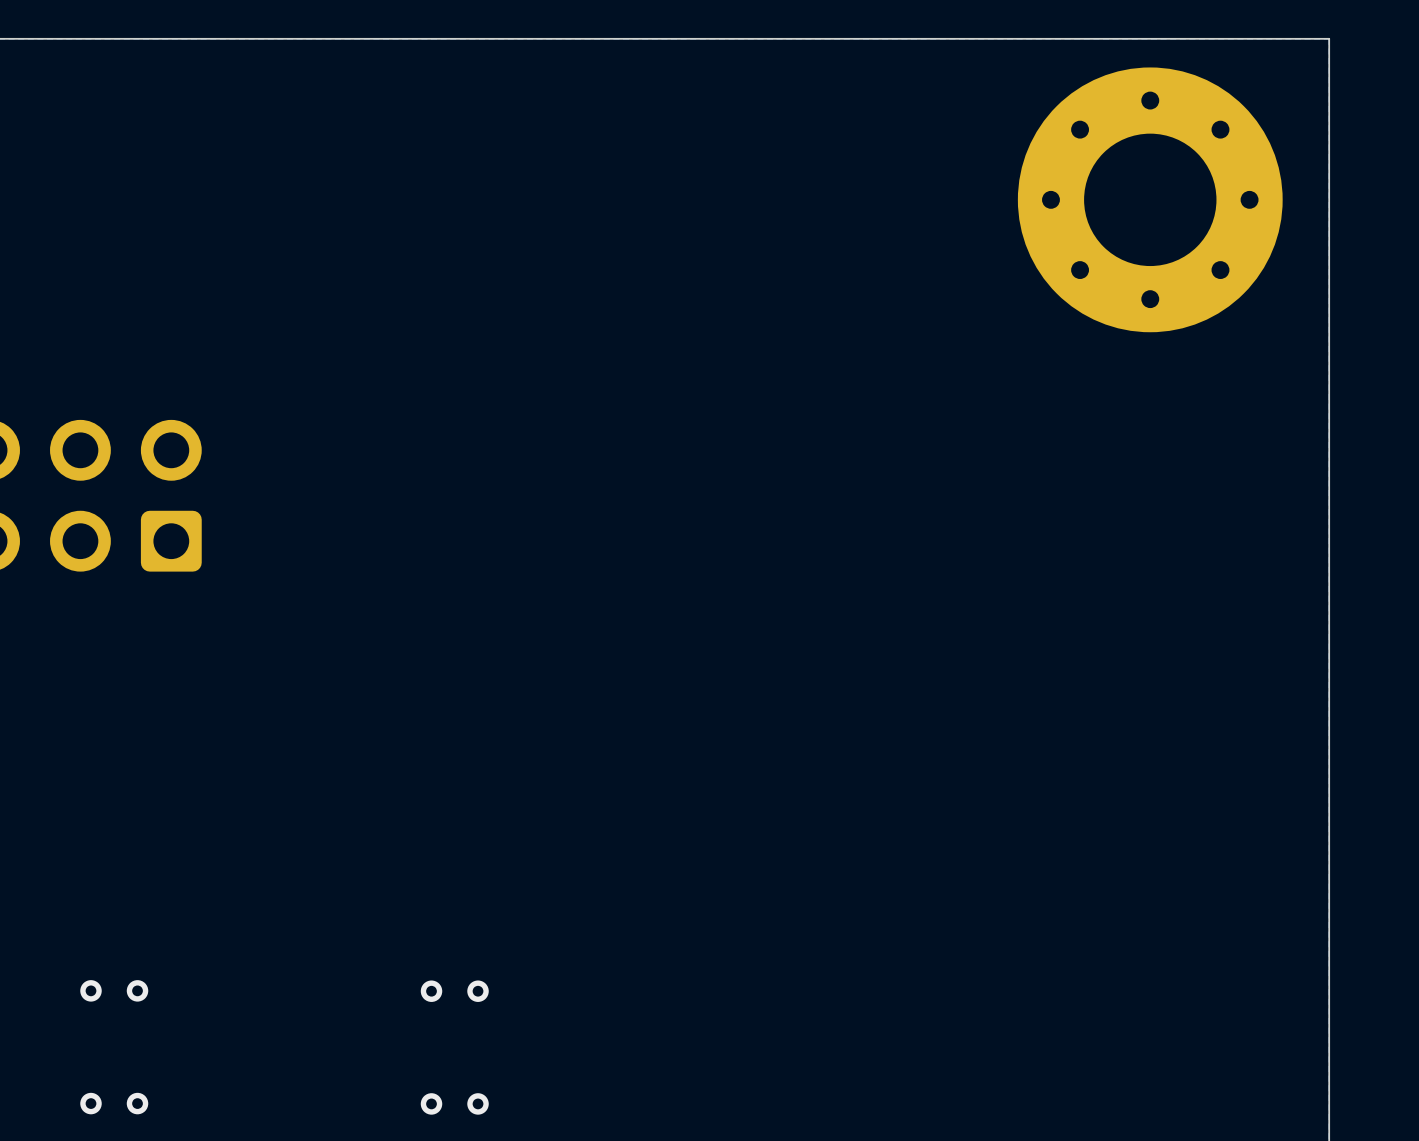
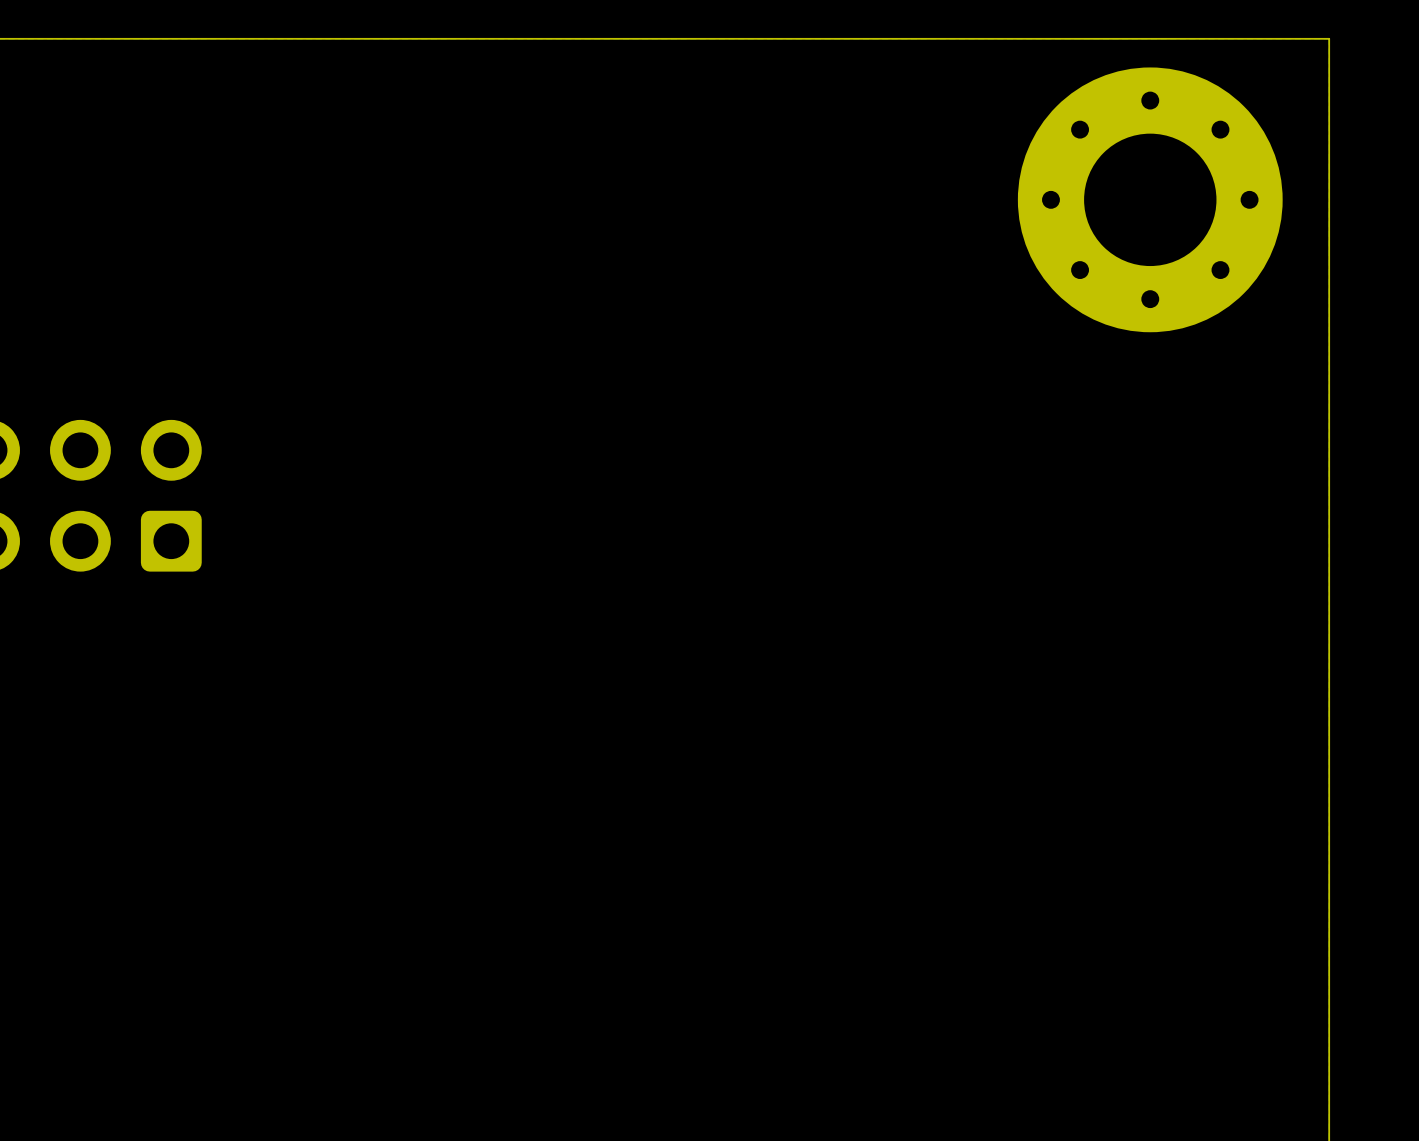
via: (91, 990) -> none
via: (137, 990) -> none
via: (431, 991) -> none
via: (478, 991) -> none
via: (91, 1103) -> none
via: (137, 1103) -> none
via: (431, 1103) -> none
via: (478, 1103) -> none

